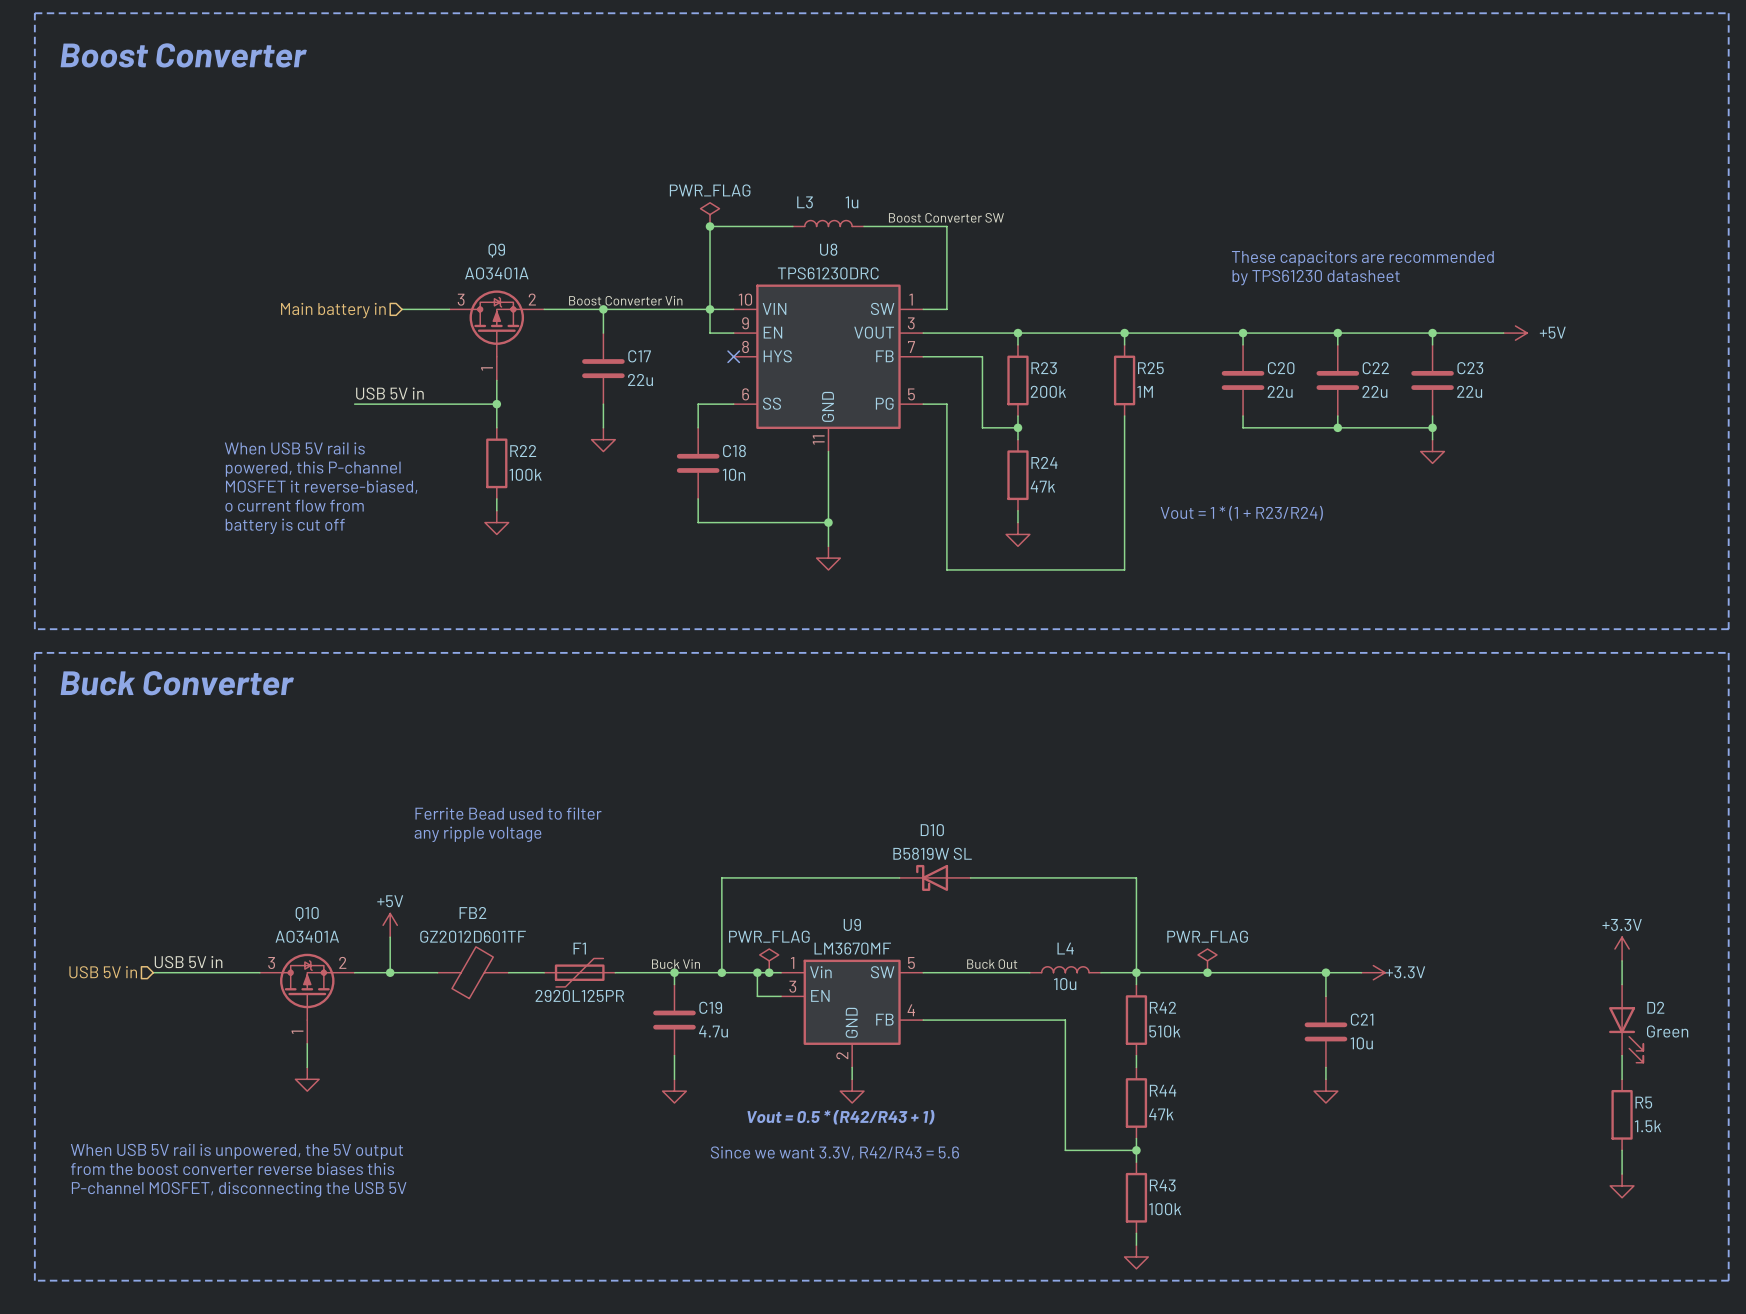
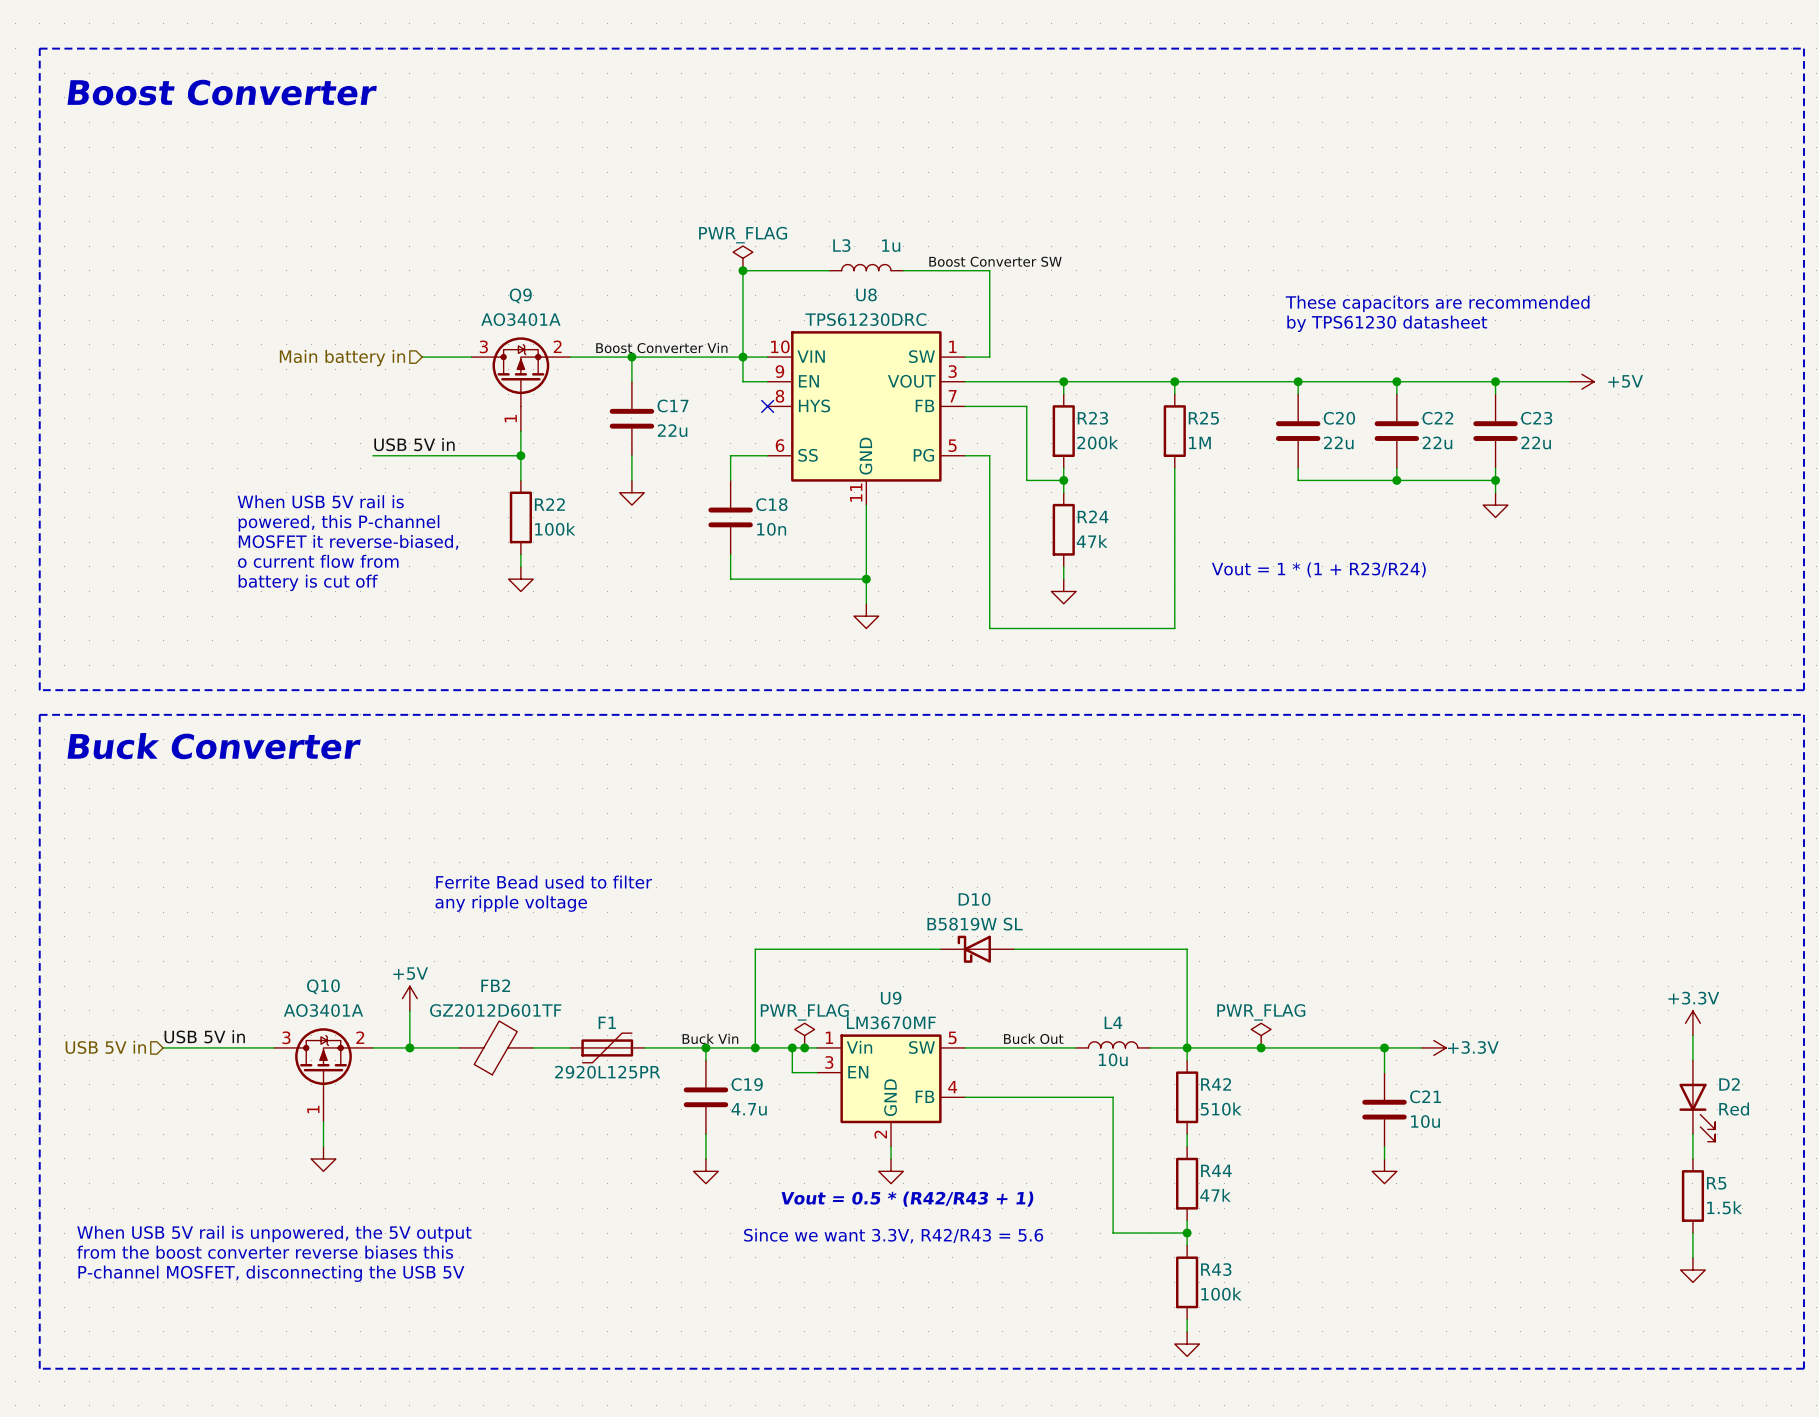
D2 value: Green (1667, 1031) -> Red (1734, 1109)

